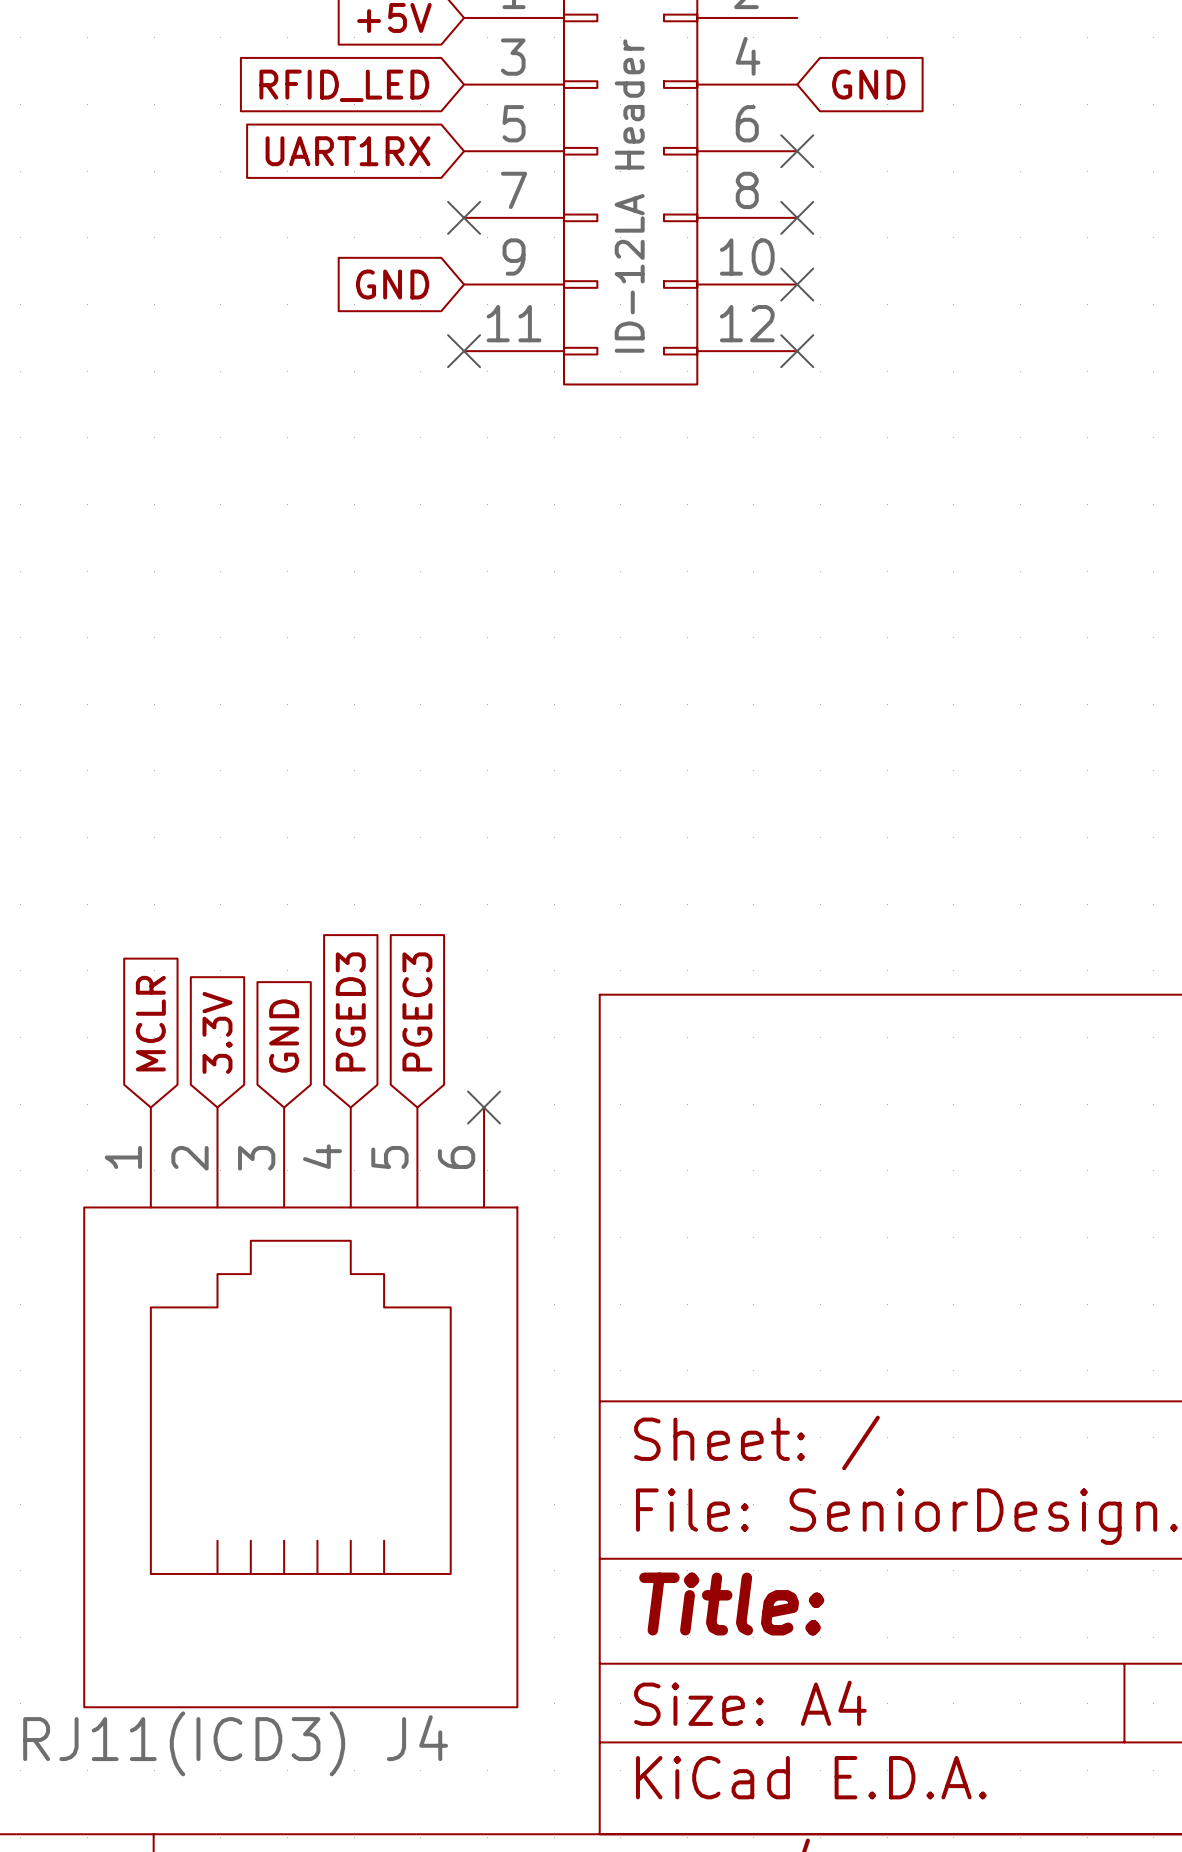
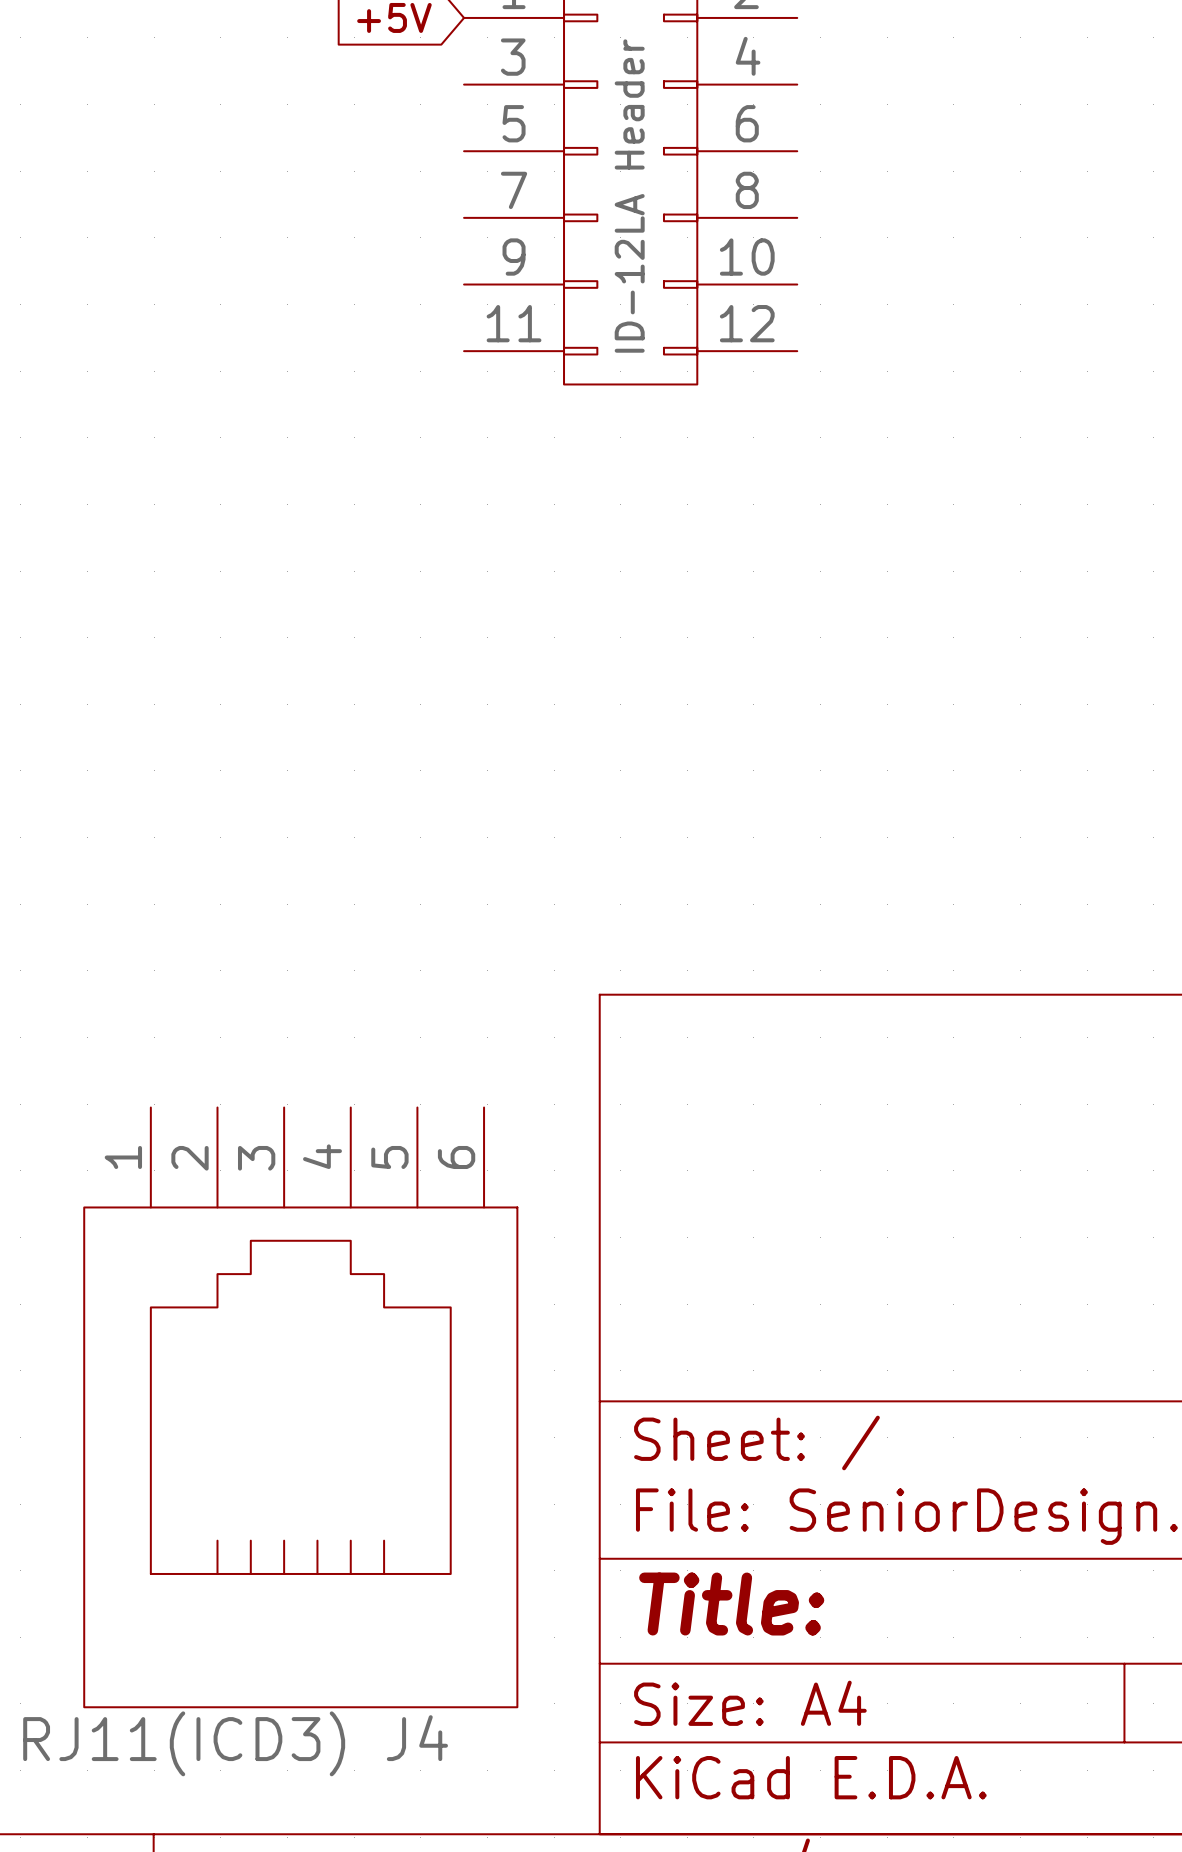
global label: GND (868, 84) -> none
global label: RFID_LED (344, 85) -> none
global label: UART1RX (348, 151) -> none
no-connect mark: (797, 151) -> none
no-connect mark: (464, 217) -> none
no-connect mark: (797, 217) -> none
global label: GND (392, 284) -> none
no-connect mark: (797, 284) -> none
no-connect mark: (464, 351) -> none
no-connect mark: (797, 351) -> none
global label: PGED3 (350, 1011) -> none
global label: PGEC3 (417, 1011) -> none
global label: MCLR (150, 1023) -> none
global label: 3.3V (217, 1032) -> none
global label: GND (284, 1036) -> none
no-connect mark: (484, 1107) -> none

